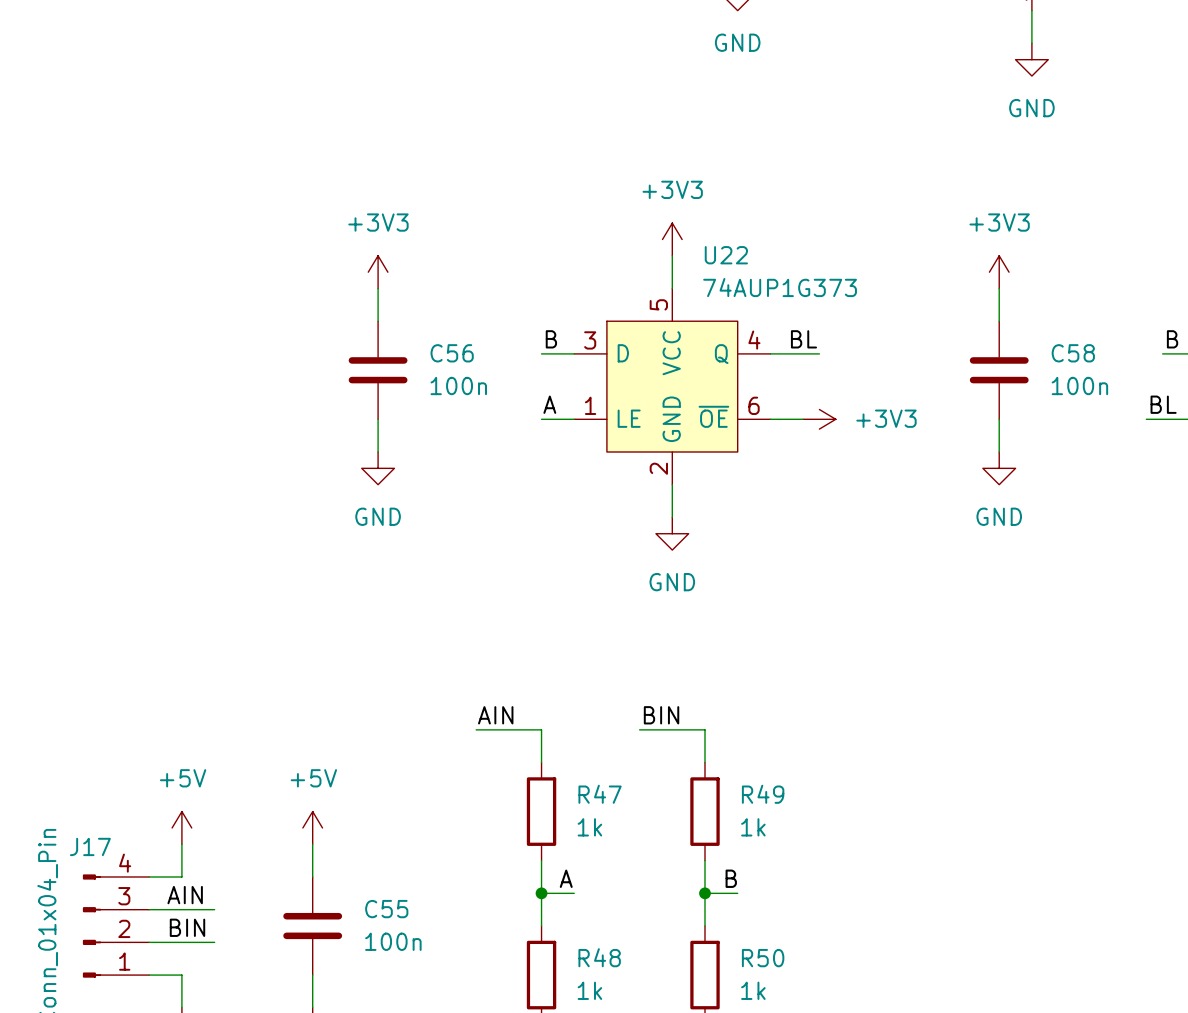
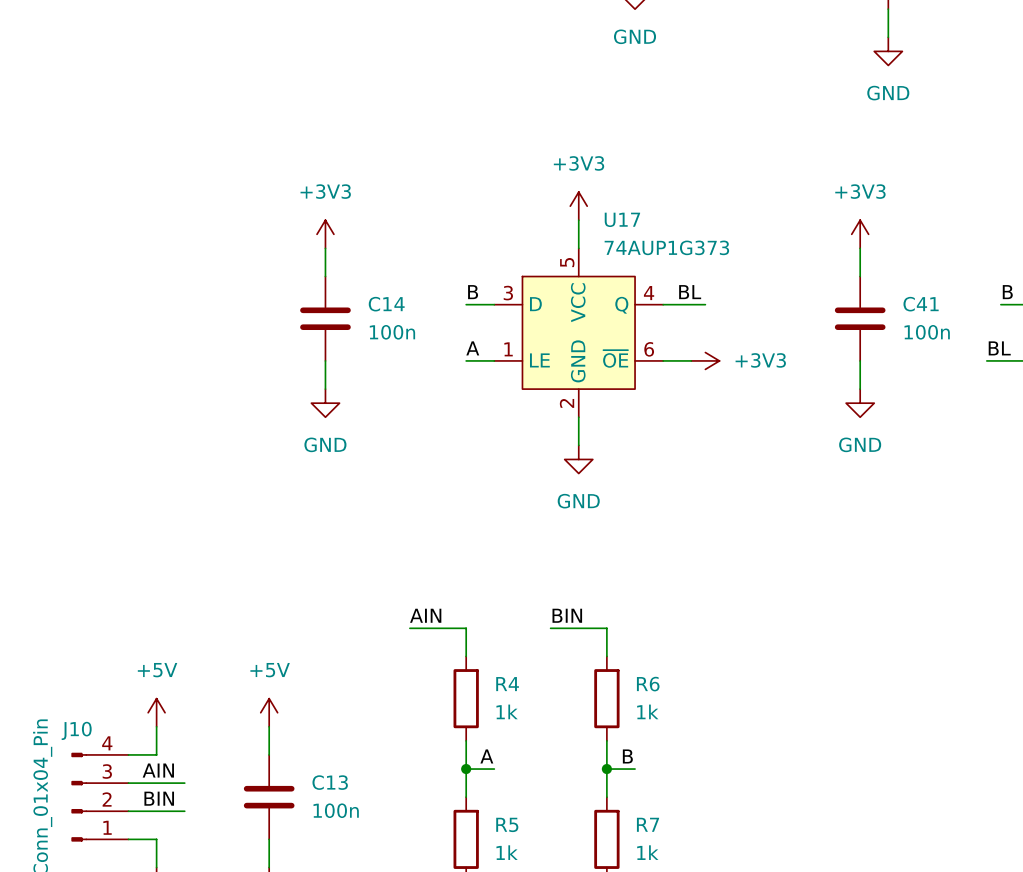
U22 name: U22 (726, 255) -> U17 (622, 219)
C56 name: C56 (452, 353) -> C14 (386, 304)
C58 name: C58 (1073, 353) -> C41 (921, 304)
R47 name: R47 (600, 794) -> R4 (507, 684)
R49 name: R49 (763, 794) -> R6 (648, 684)
J17 name: J17 (90, 846) -> J10 (76, 730)
C55 name: C55 (386, 909) -> C13 (330, 782)
R48 name: R48 (599, 957) -> R5 (507, 824)
R50 name: R50 (763, 958) -> R7 (648, 824)

